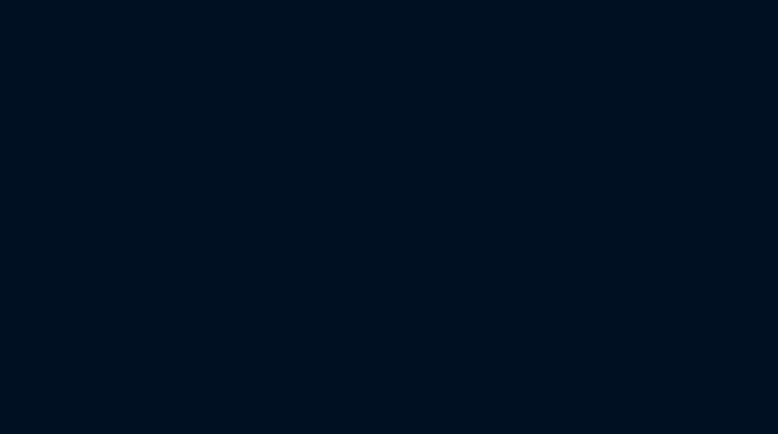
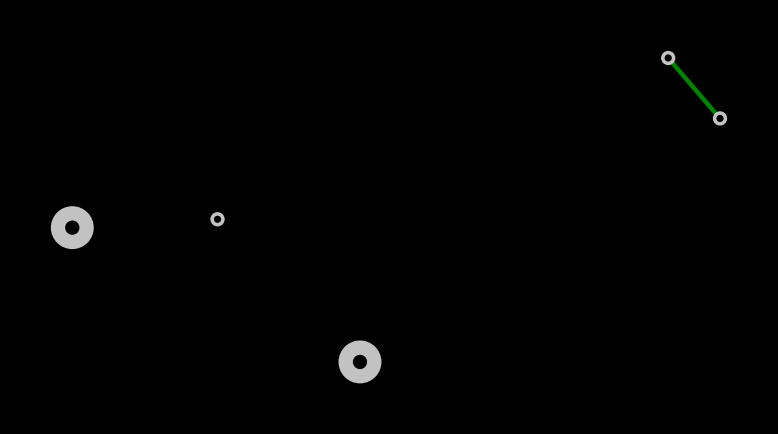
track: none -> (668, 57) (719, 118)
via: none -> (668, 57)
via: none -> (719, 118)
via: none -> (217, 219)
via: none -> (72, 227)
via: none -> (359, 361)

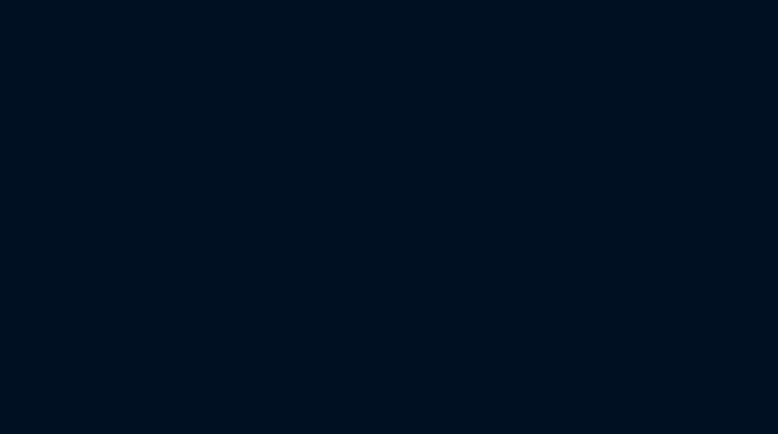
track: (668, 57) (719, 118) -> none
via: (668, 57) -> none
via: (719, 118) -> none
via: (217, 219) -> none
via: (72, 227) -> none
via: (359, 361) -> none

